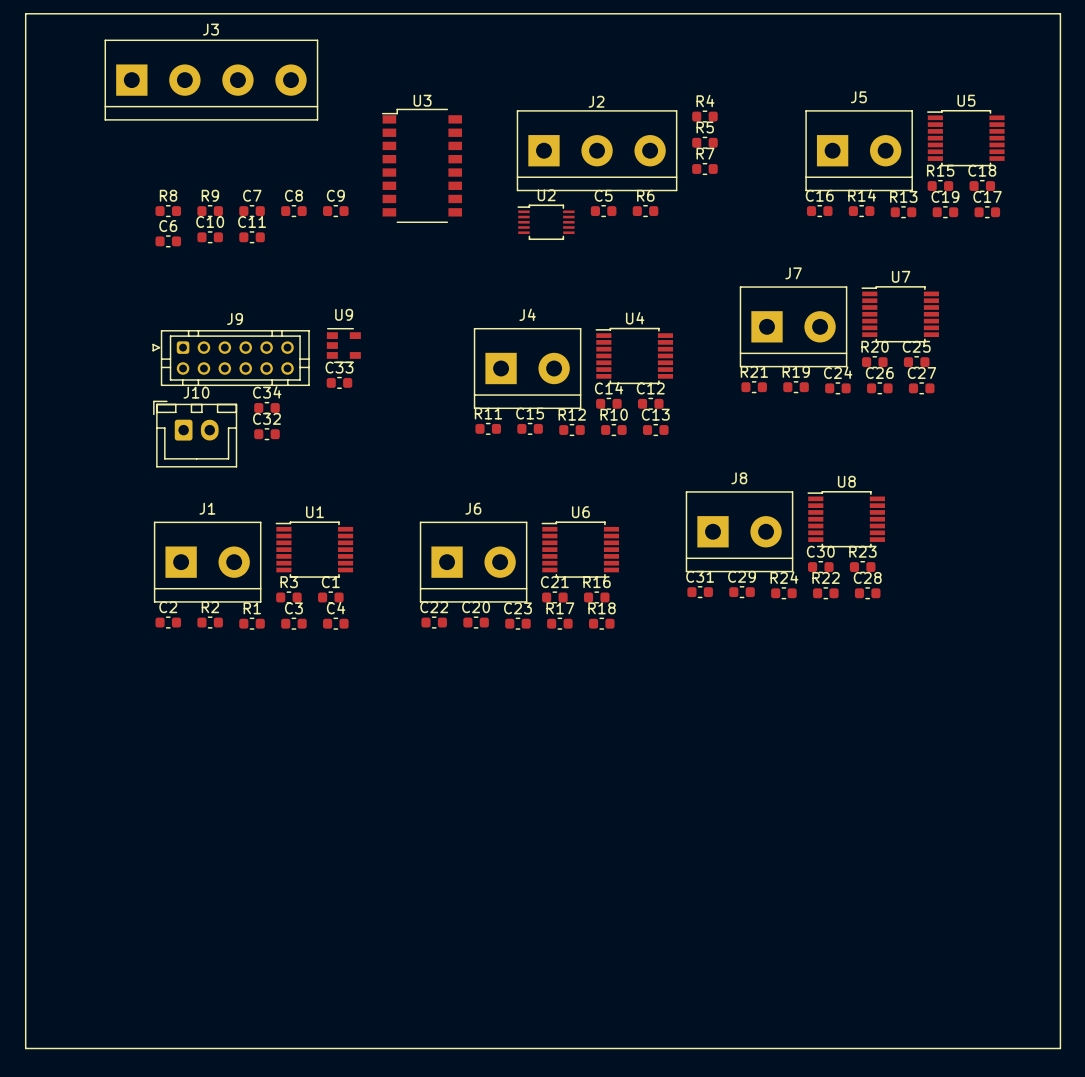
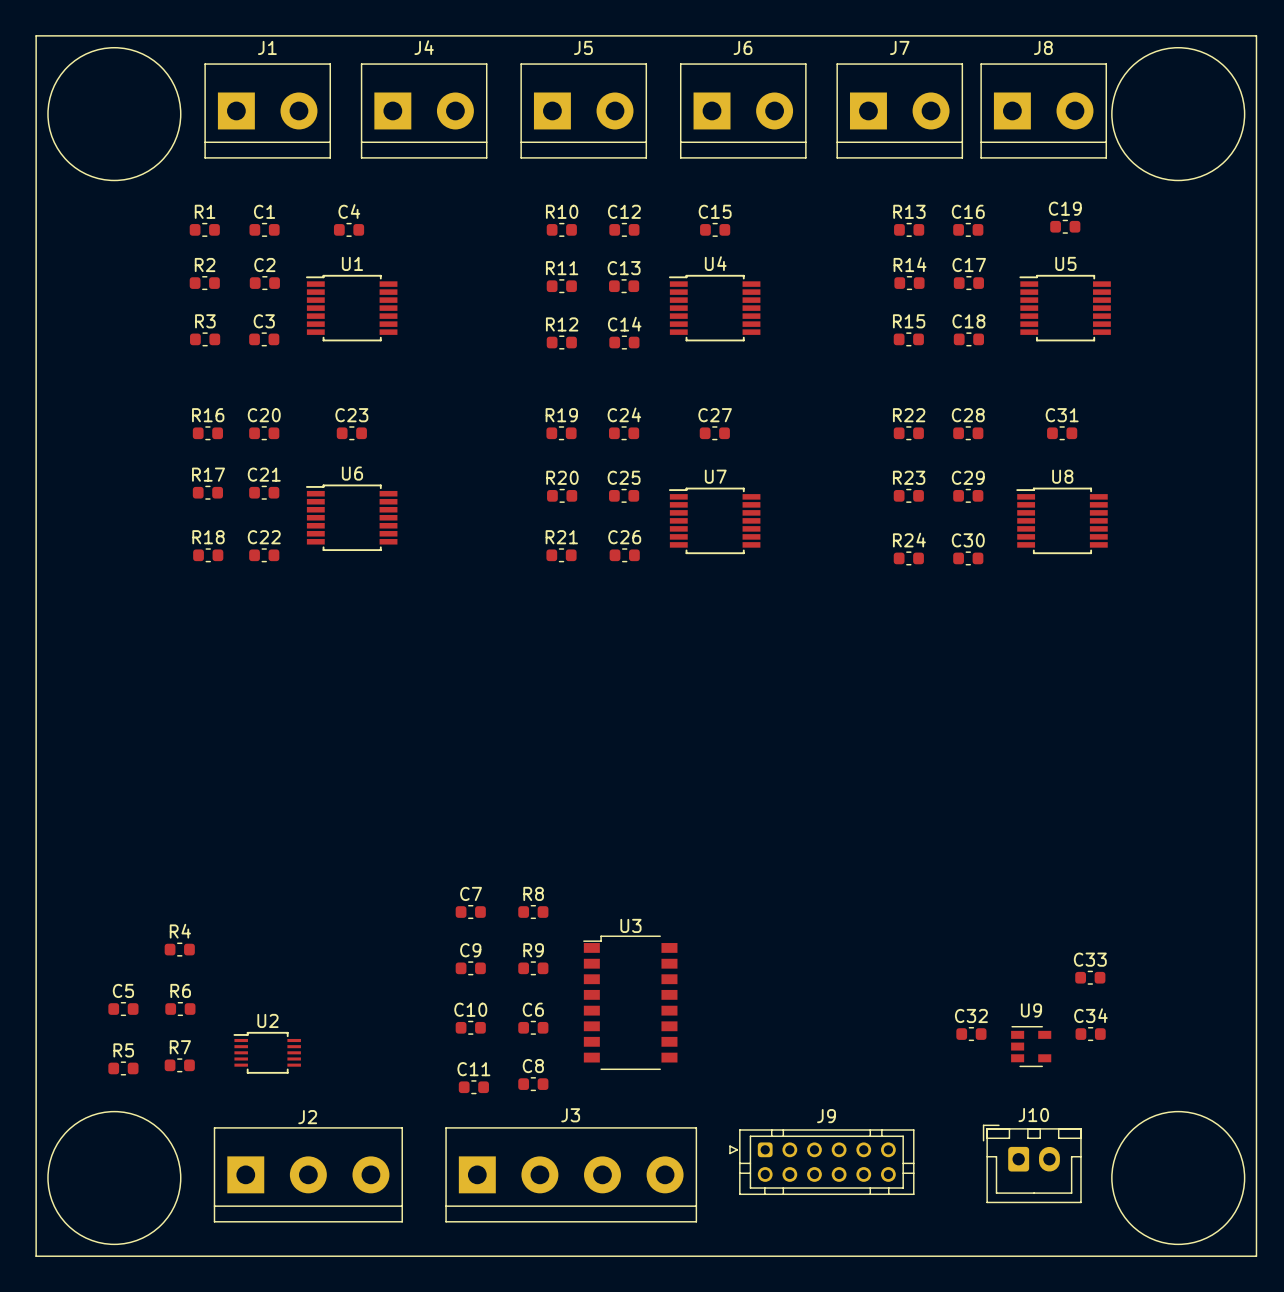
drawing: none -> [47, 46, 182, 182]
drawing: none -> [1111, 46, 1246, 182]
J3 position: (211, 80) -> (571, 1174)
R4 position: (704, 116) -> (179, 949)
U5 position: (965, 138) -> (1065, 308)
R5 position: (704, 142) -> (123, 1068)
J2 position: (597, 150) -> (308, 1174)
J5 position: (859, 150) -> (583, 110)
U3 position: (421, 165) -> (630, 1002)
R7 position: (704, 168) -> (179, 1065)
R15 position: (940, 186) -> (908, 339)
C18 position: (982, 186) -> (968, 339)
R8 position: (168, 211) -> (533, 912)
R9 position: (210, 211) -> (533, 968)
C7 position: (252, 211) -> (470, 912)
C8 position: (293, 211) -> (533, 1084)
C9 position: (335, 211) -> (470, 968)
C5 position: (603, 211) -> (123, 1009)
R6 position: (645, 211) -> (180, 1009)
C16 position: (819, 211) -> (968, 229)
R14 position: (861, 211) -> (909, 283)
R13 position: (903, 212) -> (909, 229)
C19 position: (945, 212) -> (1065, 226)
C17 position: (987, 212) -> (968, 283)
U2 position: (546, 222) -> (267, 1052)
C10 position: (210, 237) -> (470, 1027)
C11 position: (252, 237) -> (473, 1087)
C6 position: (168, 241) -> (533, 1027)
U7 position: (900, 314) -> (714, 520)
J7 position: (793, 326) -> (899, 110)
U9 position: (343, 345) -> (1031, 1046)
U4 position: (634, 355) -> (714, 308)
J9 position: (231, 358) -> (821, 1162)
R20 position: (874, 362) -> (562, 495)
C25 position: (916, 362) -> (624, 495)
J4 position: (527, 368) -> (424, 110)
C33 position: (339, 382) -> (1090, 977)
R21 position: (754, 387) -> (561, 555)
R19 position: (796, 387) -> (561, 433)
C24 position: (837, 388) -> (624, 433)
C26 position: (879, 388) -> (624, 555)
C27 position: (921, 388) -> (714, 433)
C14 position: (608, 403) -> (624, 342)
C12 position: (650, 403) -> (624, 229)
C34 position: (266, 407) -> (1090, 1034)
R11 position: (488, 428) -> (561, 286)
C15 position: (530, 428) -> (715, 229)
R12 position: (571, 430) -> (561, 342)
R10 position: (613, 430) -> (561, 229)
C13 position: (655, 430) -> (624, 286)
J10 position: (195, 434) -> (1032, 1163)
C32 position: (266, 434) -> (971, 1034)
U8 position: (846, 519) -> (1062, 520)
J8 position: (739, 531) -> (1043, 110)
U1 position: (314, 549) -> (351, 308)
U6 position: (580, 549) -> (351, 517)
J1 position: (207, 562) -> (267, 110)
J6 position: (473, 562) -> (743, 110)
C30 position: (820, 567) -> (968, 558)
R23 position: (862, 567) -> (908, 495)
C31 position: (700, 592) -> (1062, 433)
C29 position: (742, 592) -> (968, 495)
R24 position: (783, 593) -> (908, 558)
R22 position: (825, 593) -> (908, 433)
C28 position: (867, 593) -> (968, 433)
R3 position: (288, 597) -> (205, 339)
C1 position: (330, 597) -> (264, 229)
C21 position: (554, 597) -> (264, 492)
R16 position: (596, 597) -> (207, 433)
C2 position: (168, 622) -> (264, 283)
R2 position: (210, 622) -> (204, 283)
C22 position: (434, 622) -> (264, 555)
C20 position: (476, 622) -> (264, 433)
R1 position: (252, 623) -> (204, 229)
C3 position: (293, 623) -> (264, 339)
C4 position: (335, 623) -> (349, 229)
C23 position: (517, 623) -> (351, 433)
R17 position: (559, 623) -> (207, 492)
R18 position: (601, 623) -> (208, 555)
drawing: none -> [47, 1110, 182, 1246]
drawing: none -> [1111, 1110, 1246, 1246]

